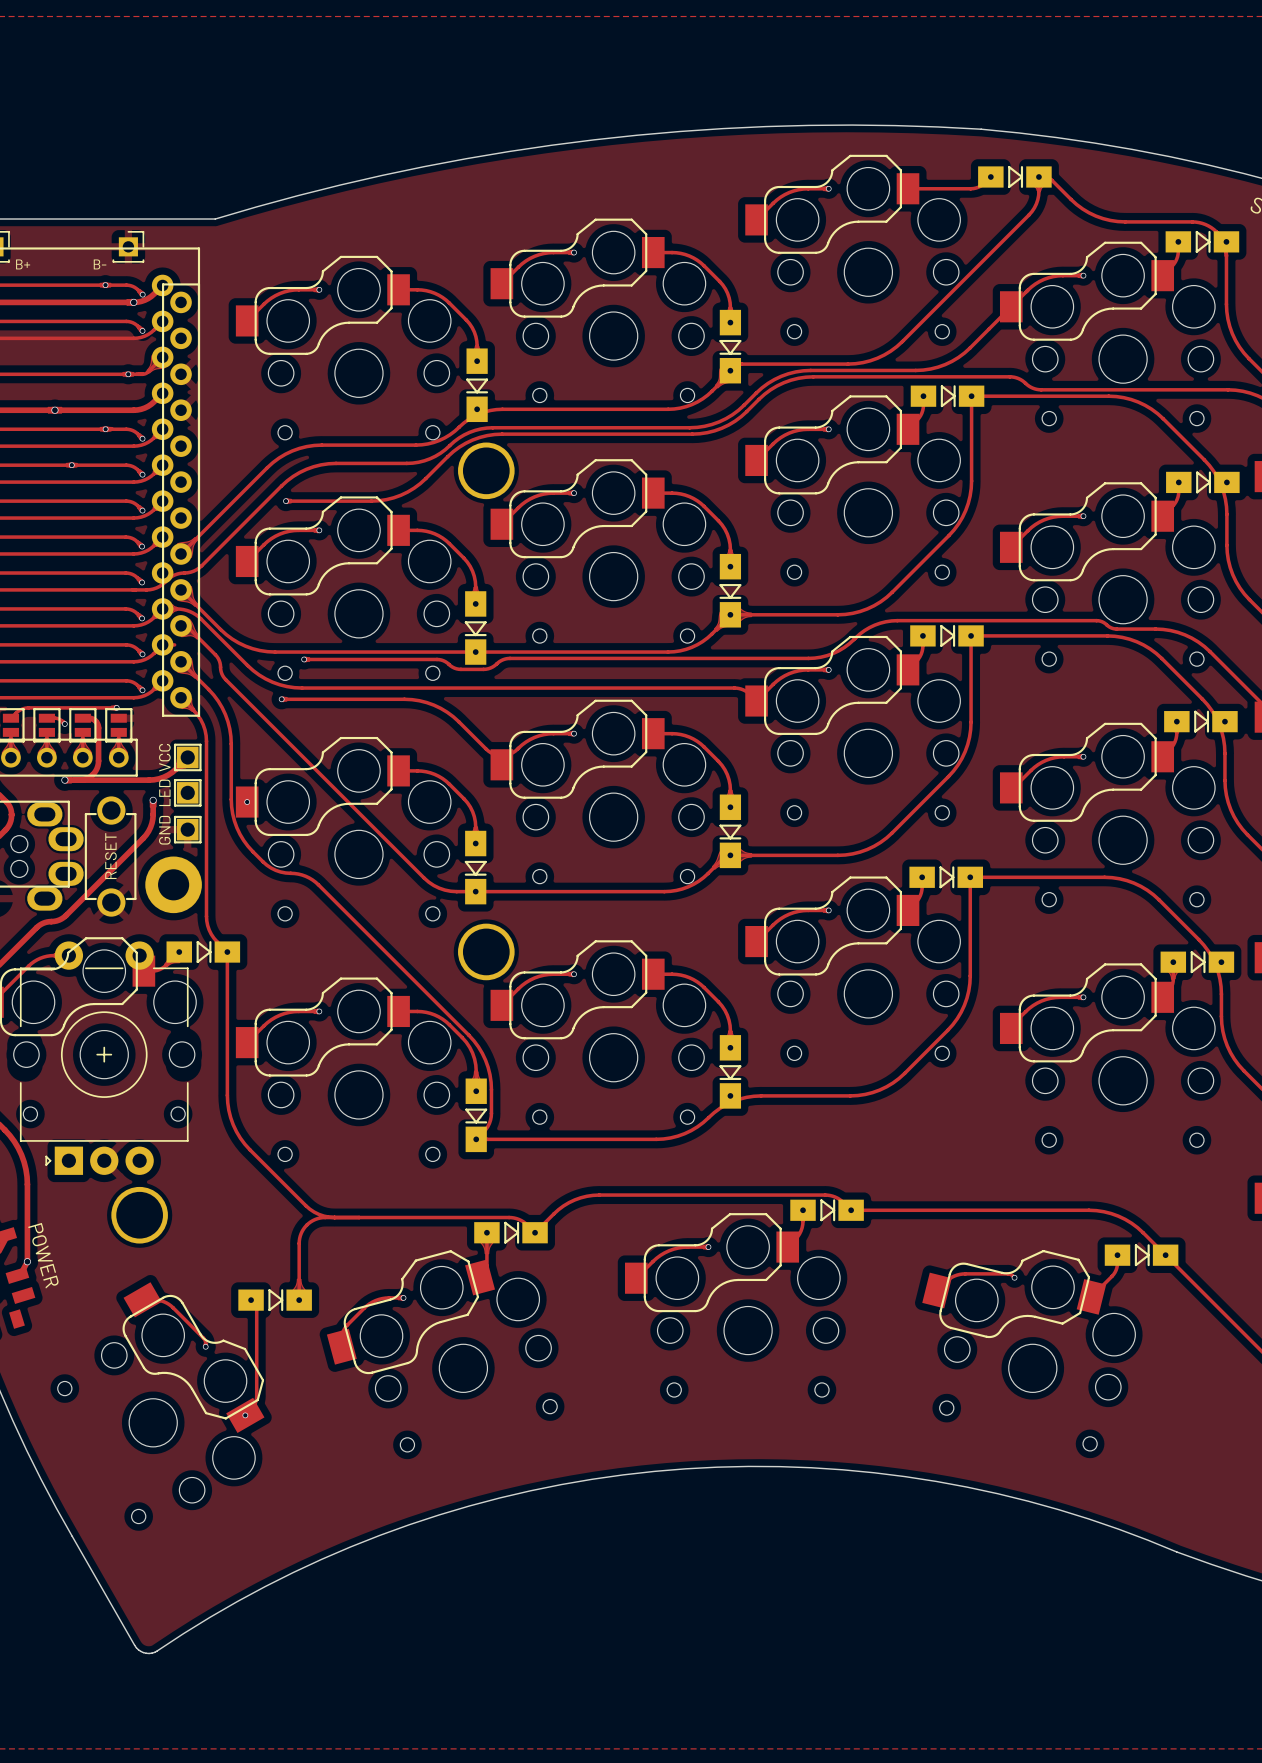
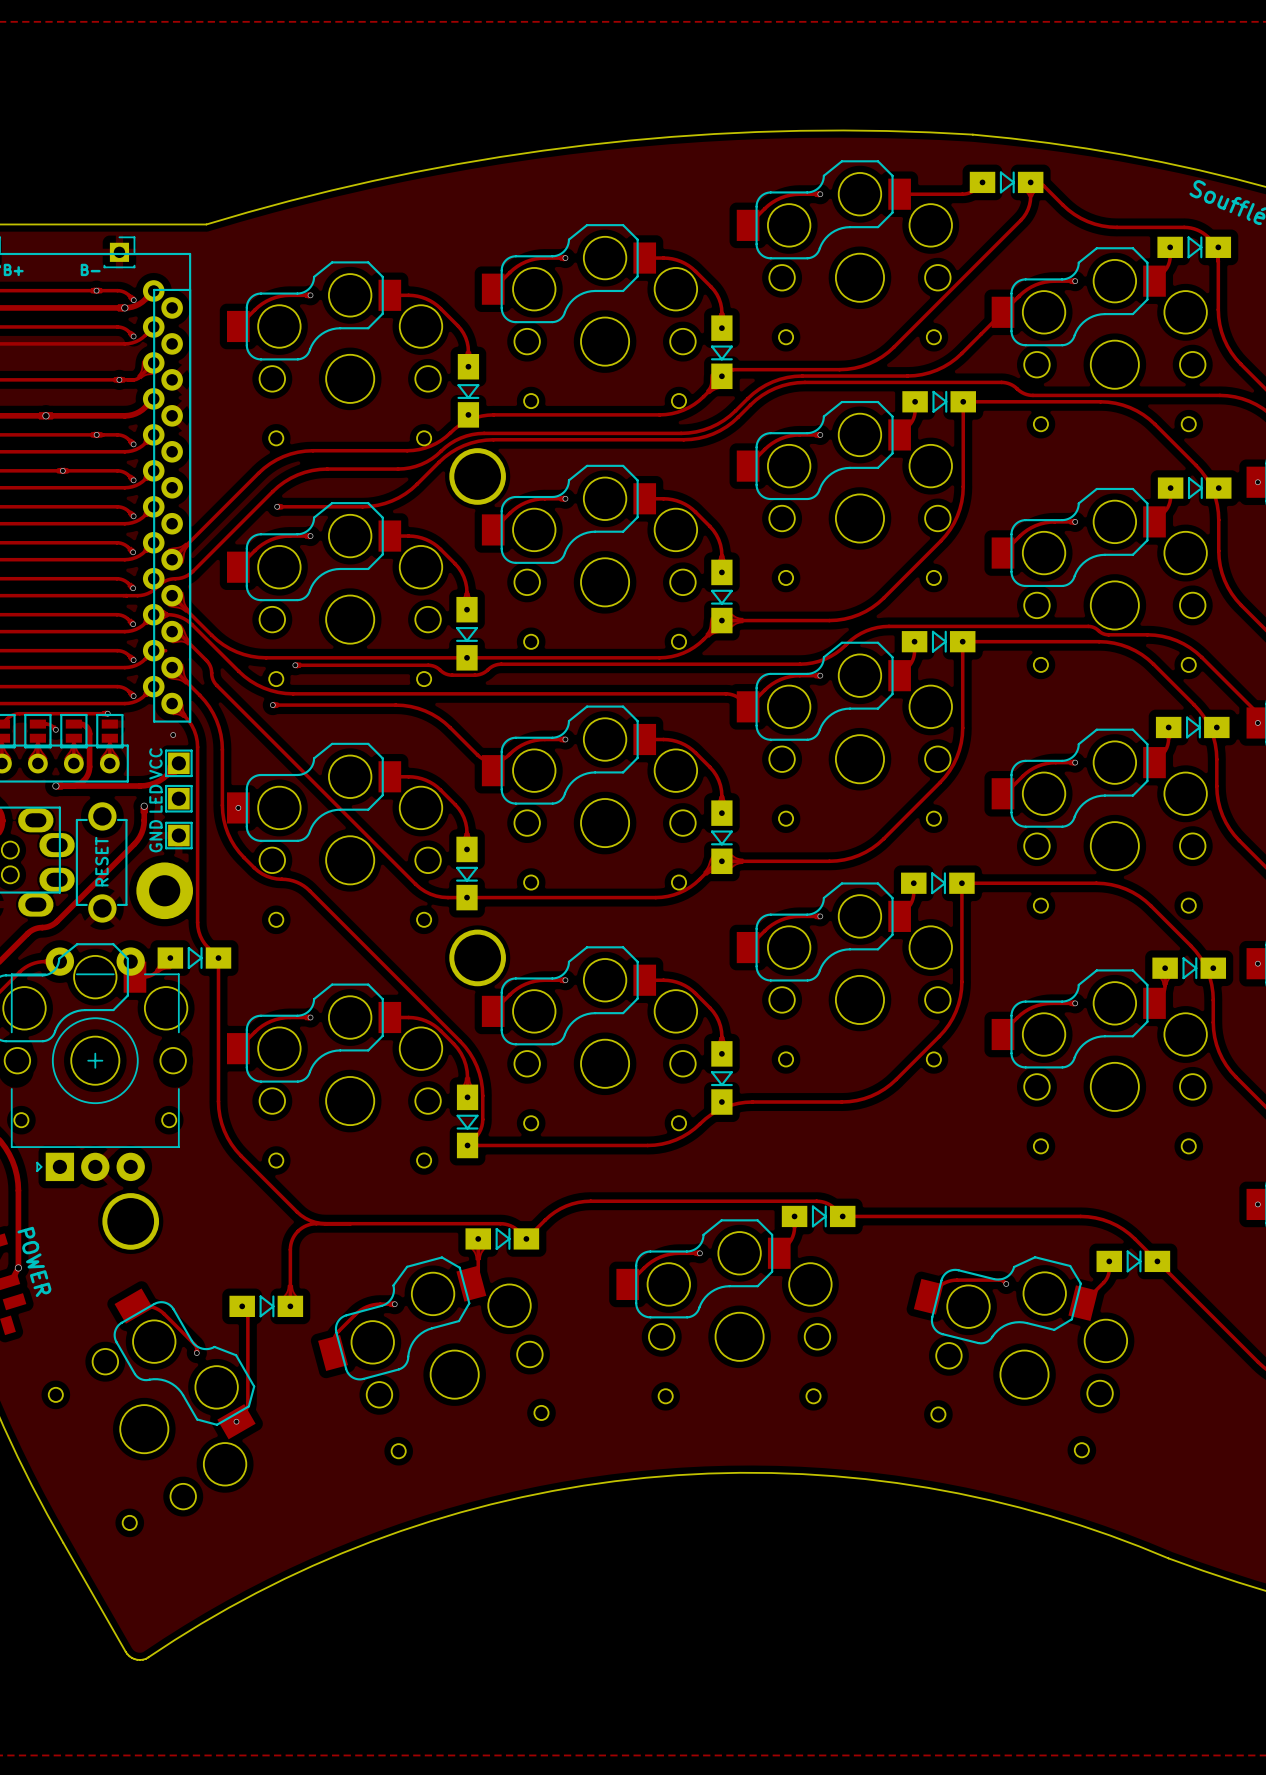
via: none -> (173, 735)

